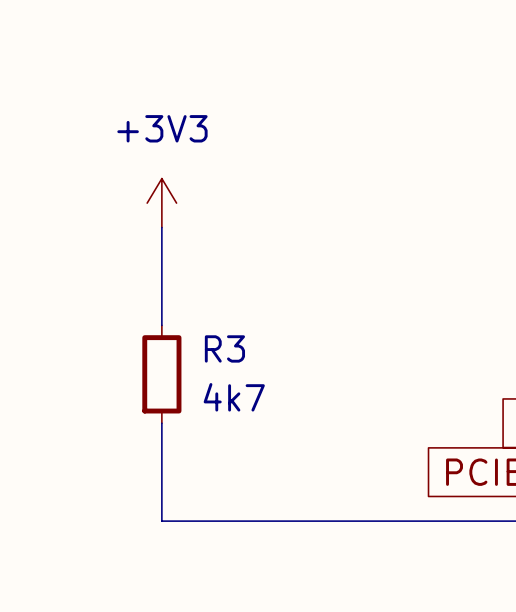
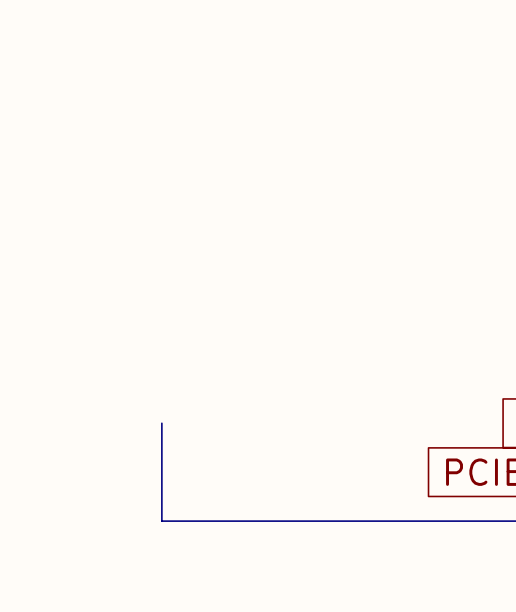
power symbol: +3V3 (161, 203) -> none
wire: (161, 227) (161, 325) -> none
R3: (161, 374) -> none

